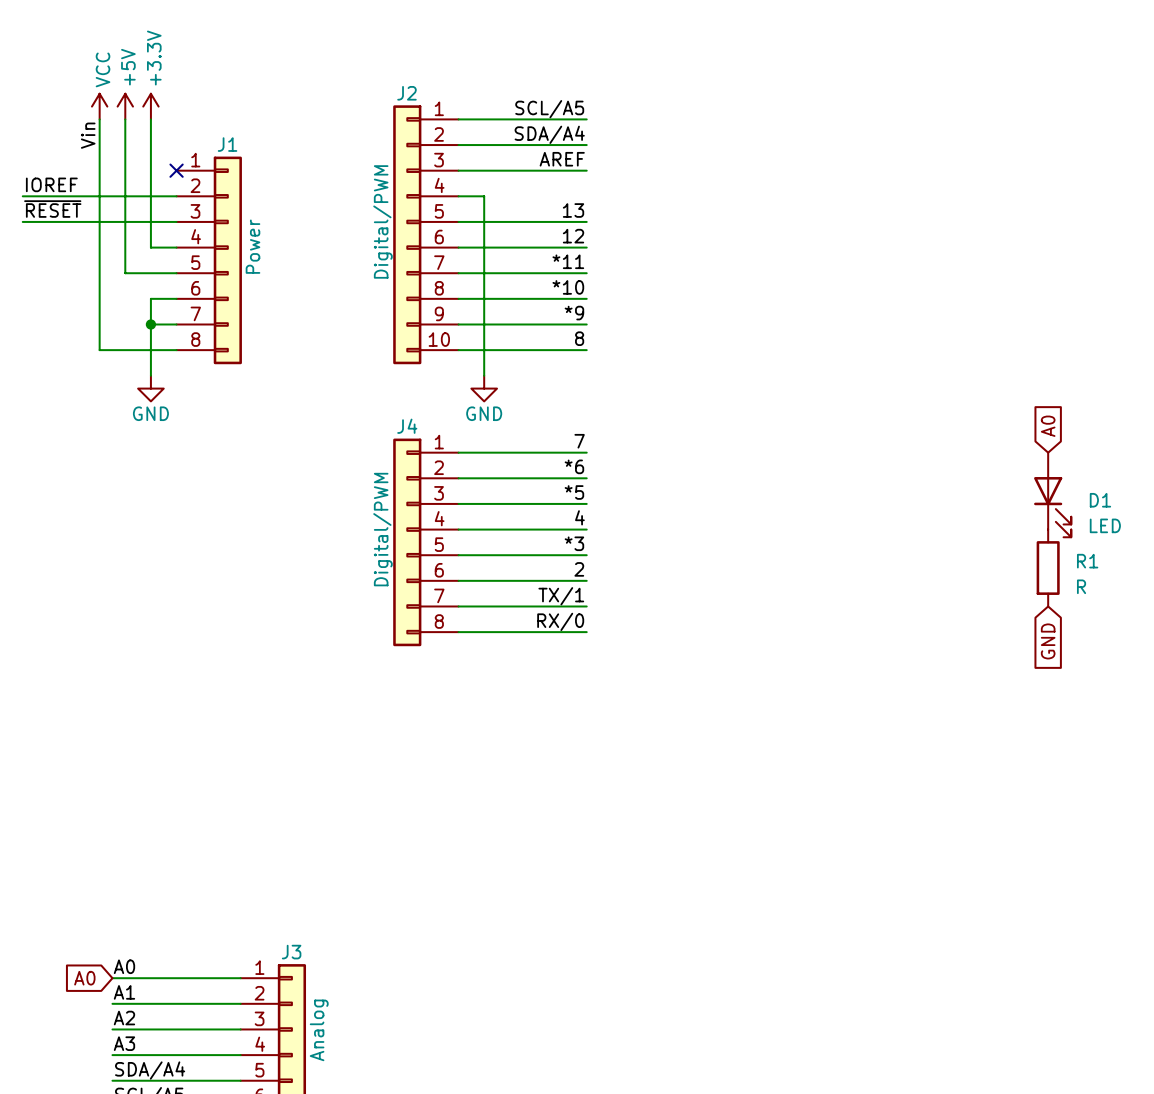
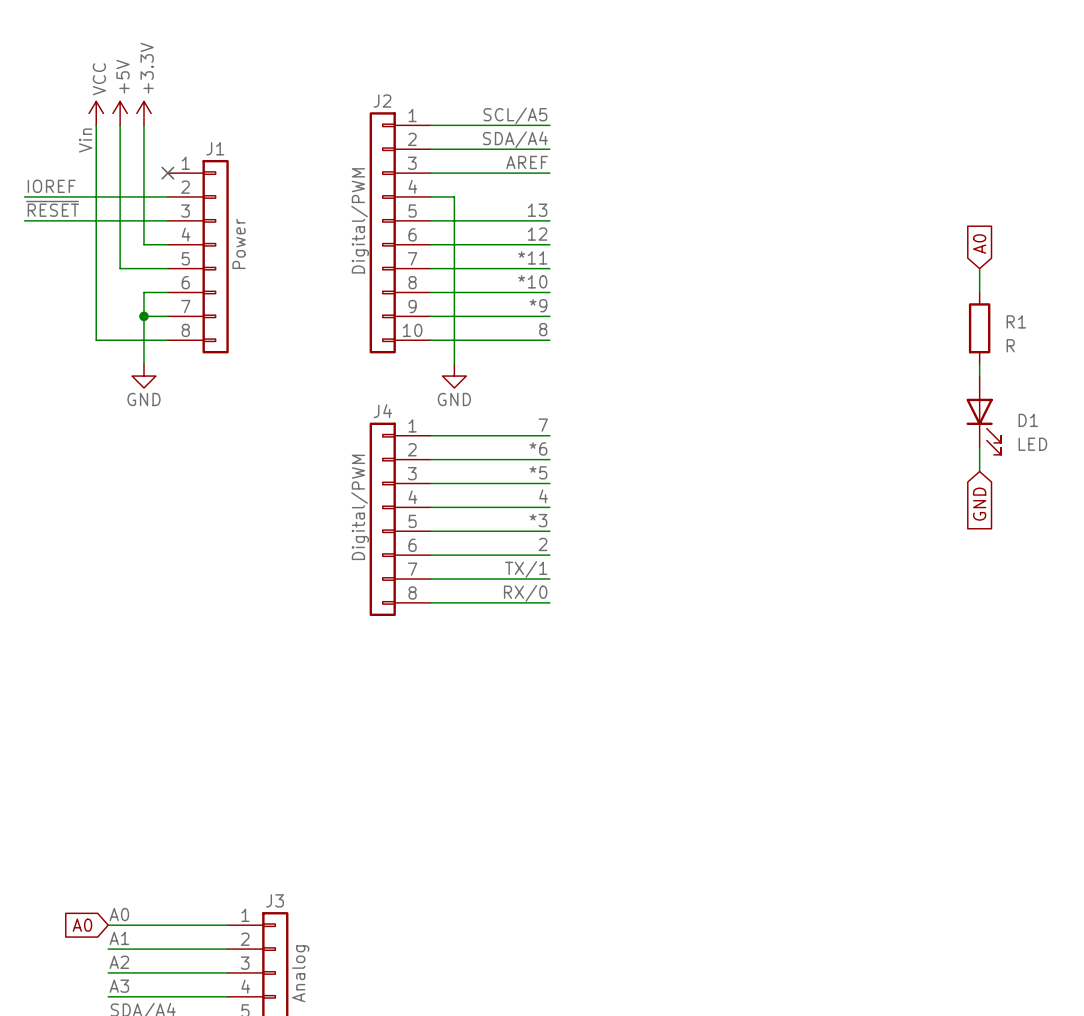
wire: none -> (979, 268) (979, 292)
wire: none -> (979, 364) (979, 376)
global label position: A0 (1048, 426) -> A0 (979, 244)
D1 position: (1052, 494) -> (983, 415)
R1 position: (1048, 568) -> (979, 328)
global label position: GND (1048, 641) -> GND (979, 504)

